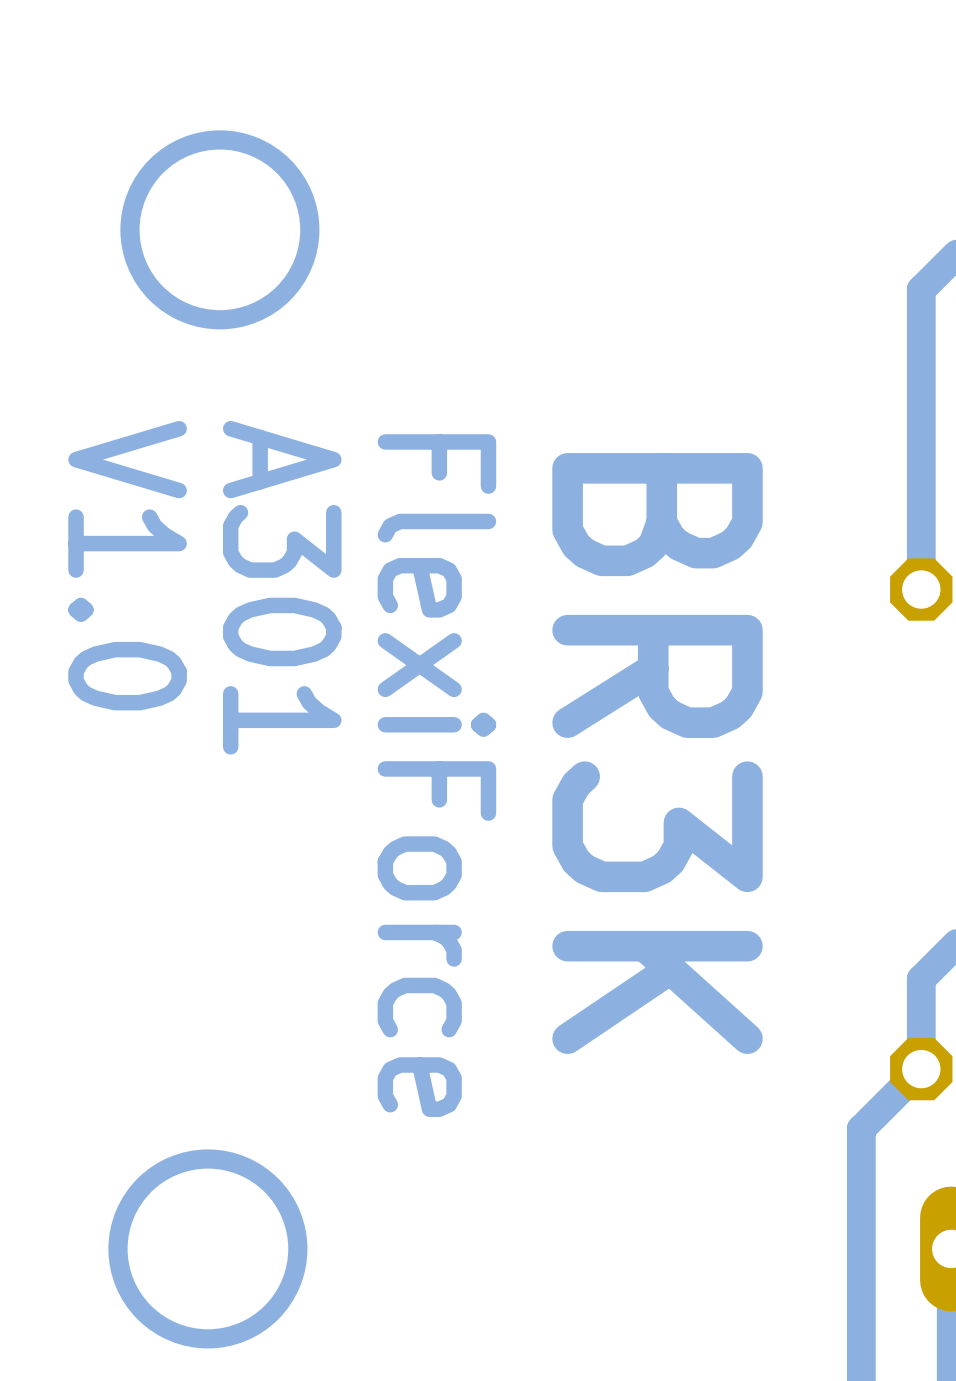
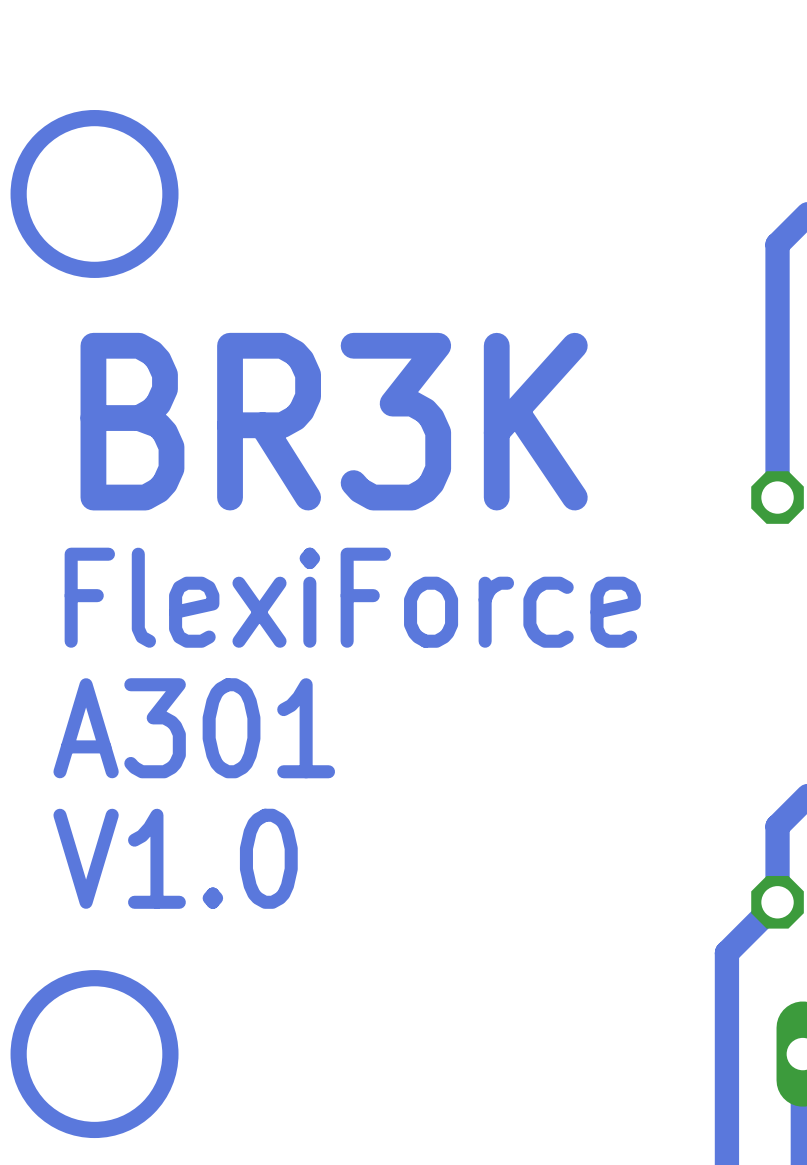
drawing position: (219, 229) -> (94, 193)
text rotation: 0° (127, 565) -> 90° counterclockwise (175, 858)
text position: V1.0 (127, 565) -> V1.0 (175, 858)
text rotation: 0° (282, 587) -> 90° counterclockwise (194, 728)
text rotation: 0° (657, 753) -> 90° counterclockwise (334, 421)
text rotation: 0° (436, 775) -> 90° counterclockwise (352, 597)
drawing position: (207, 1248) -> (94, 1054)

